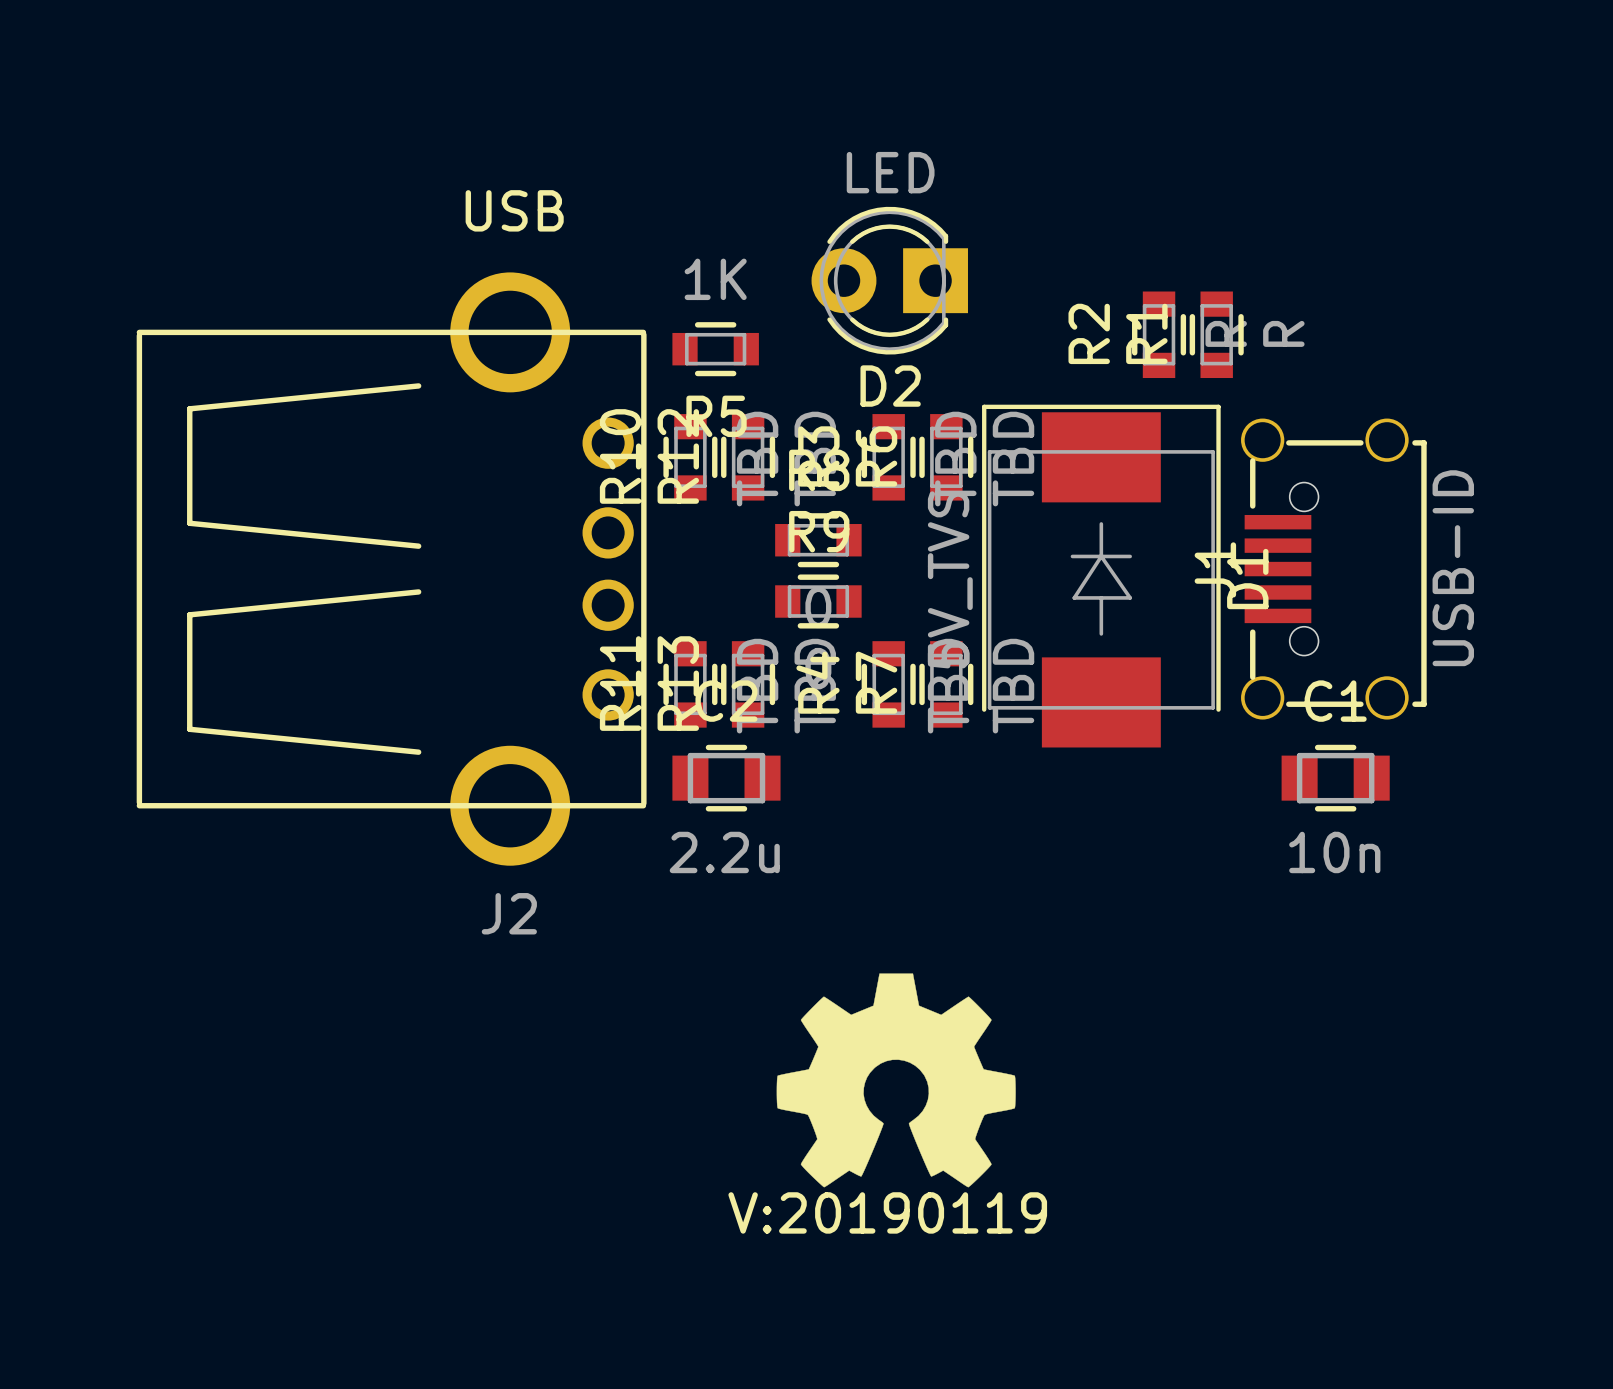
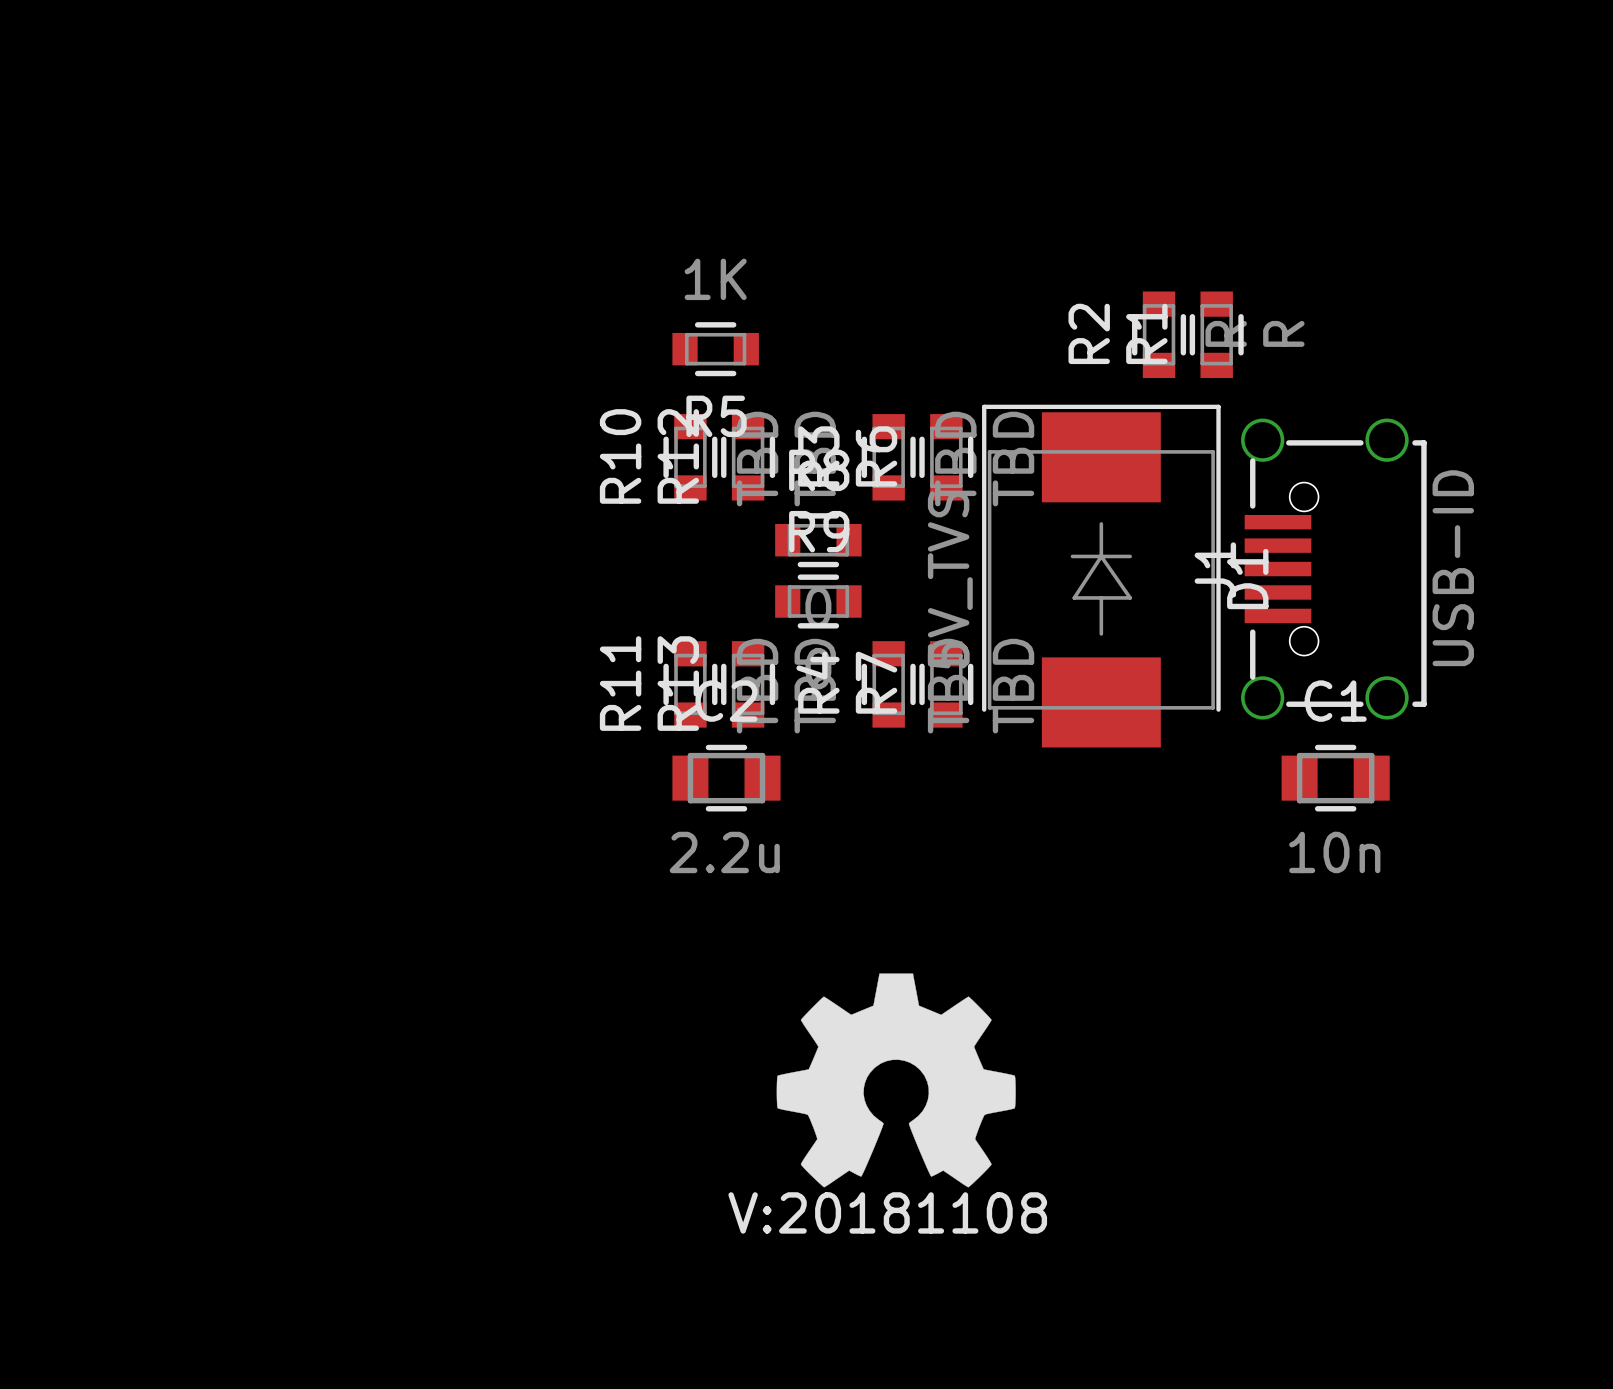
D2: LED (889, 280) -> none
J2: USB (391, 569) -> none
drawing shape: [728, 1192, 1048, 1234] -> [728, 1192, 1048, 1234]

